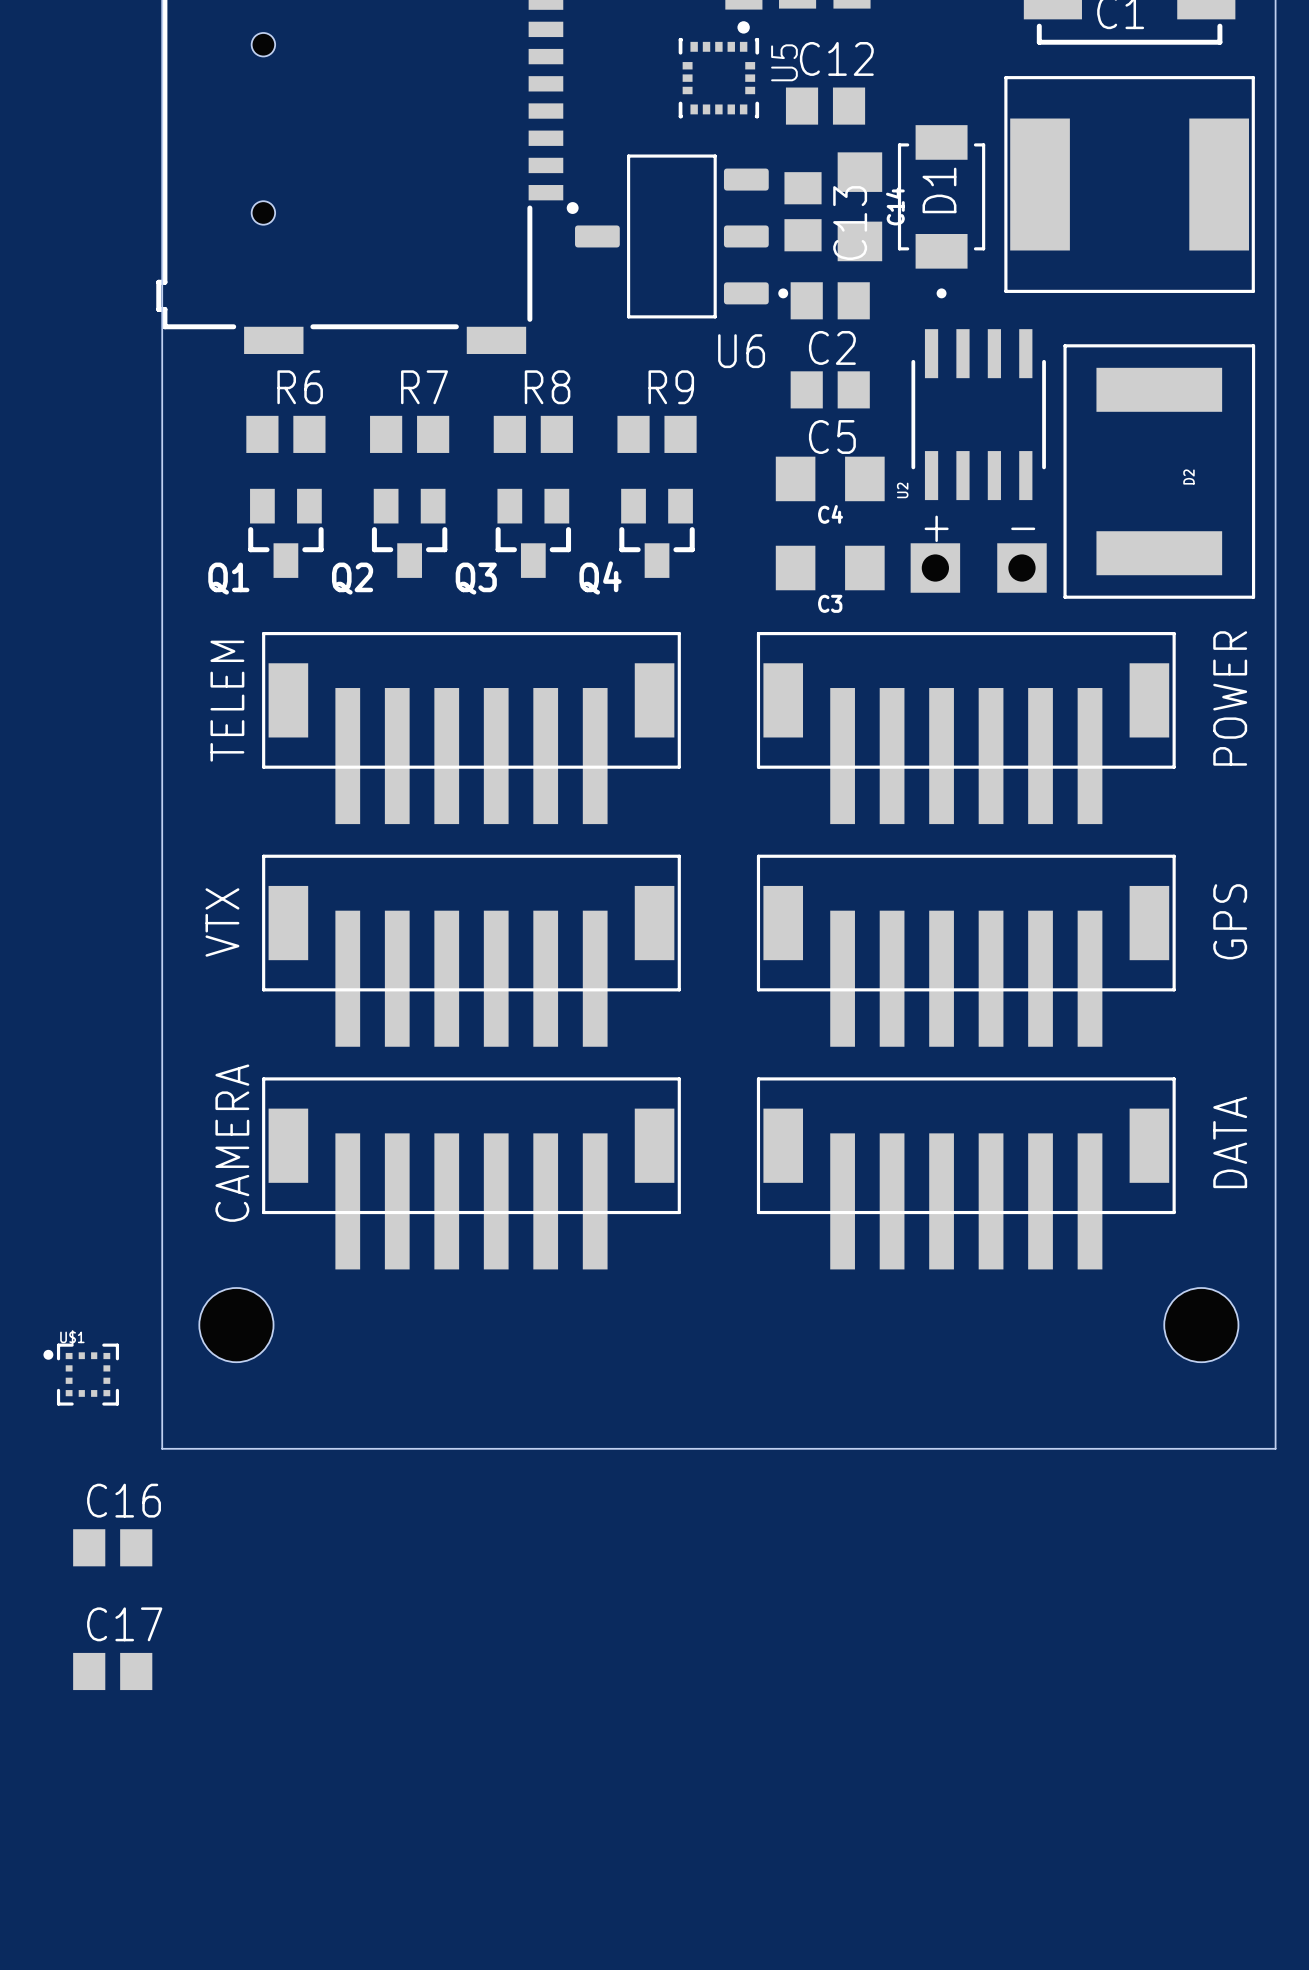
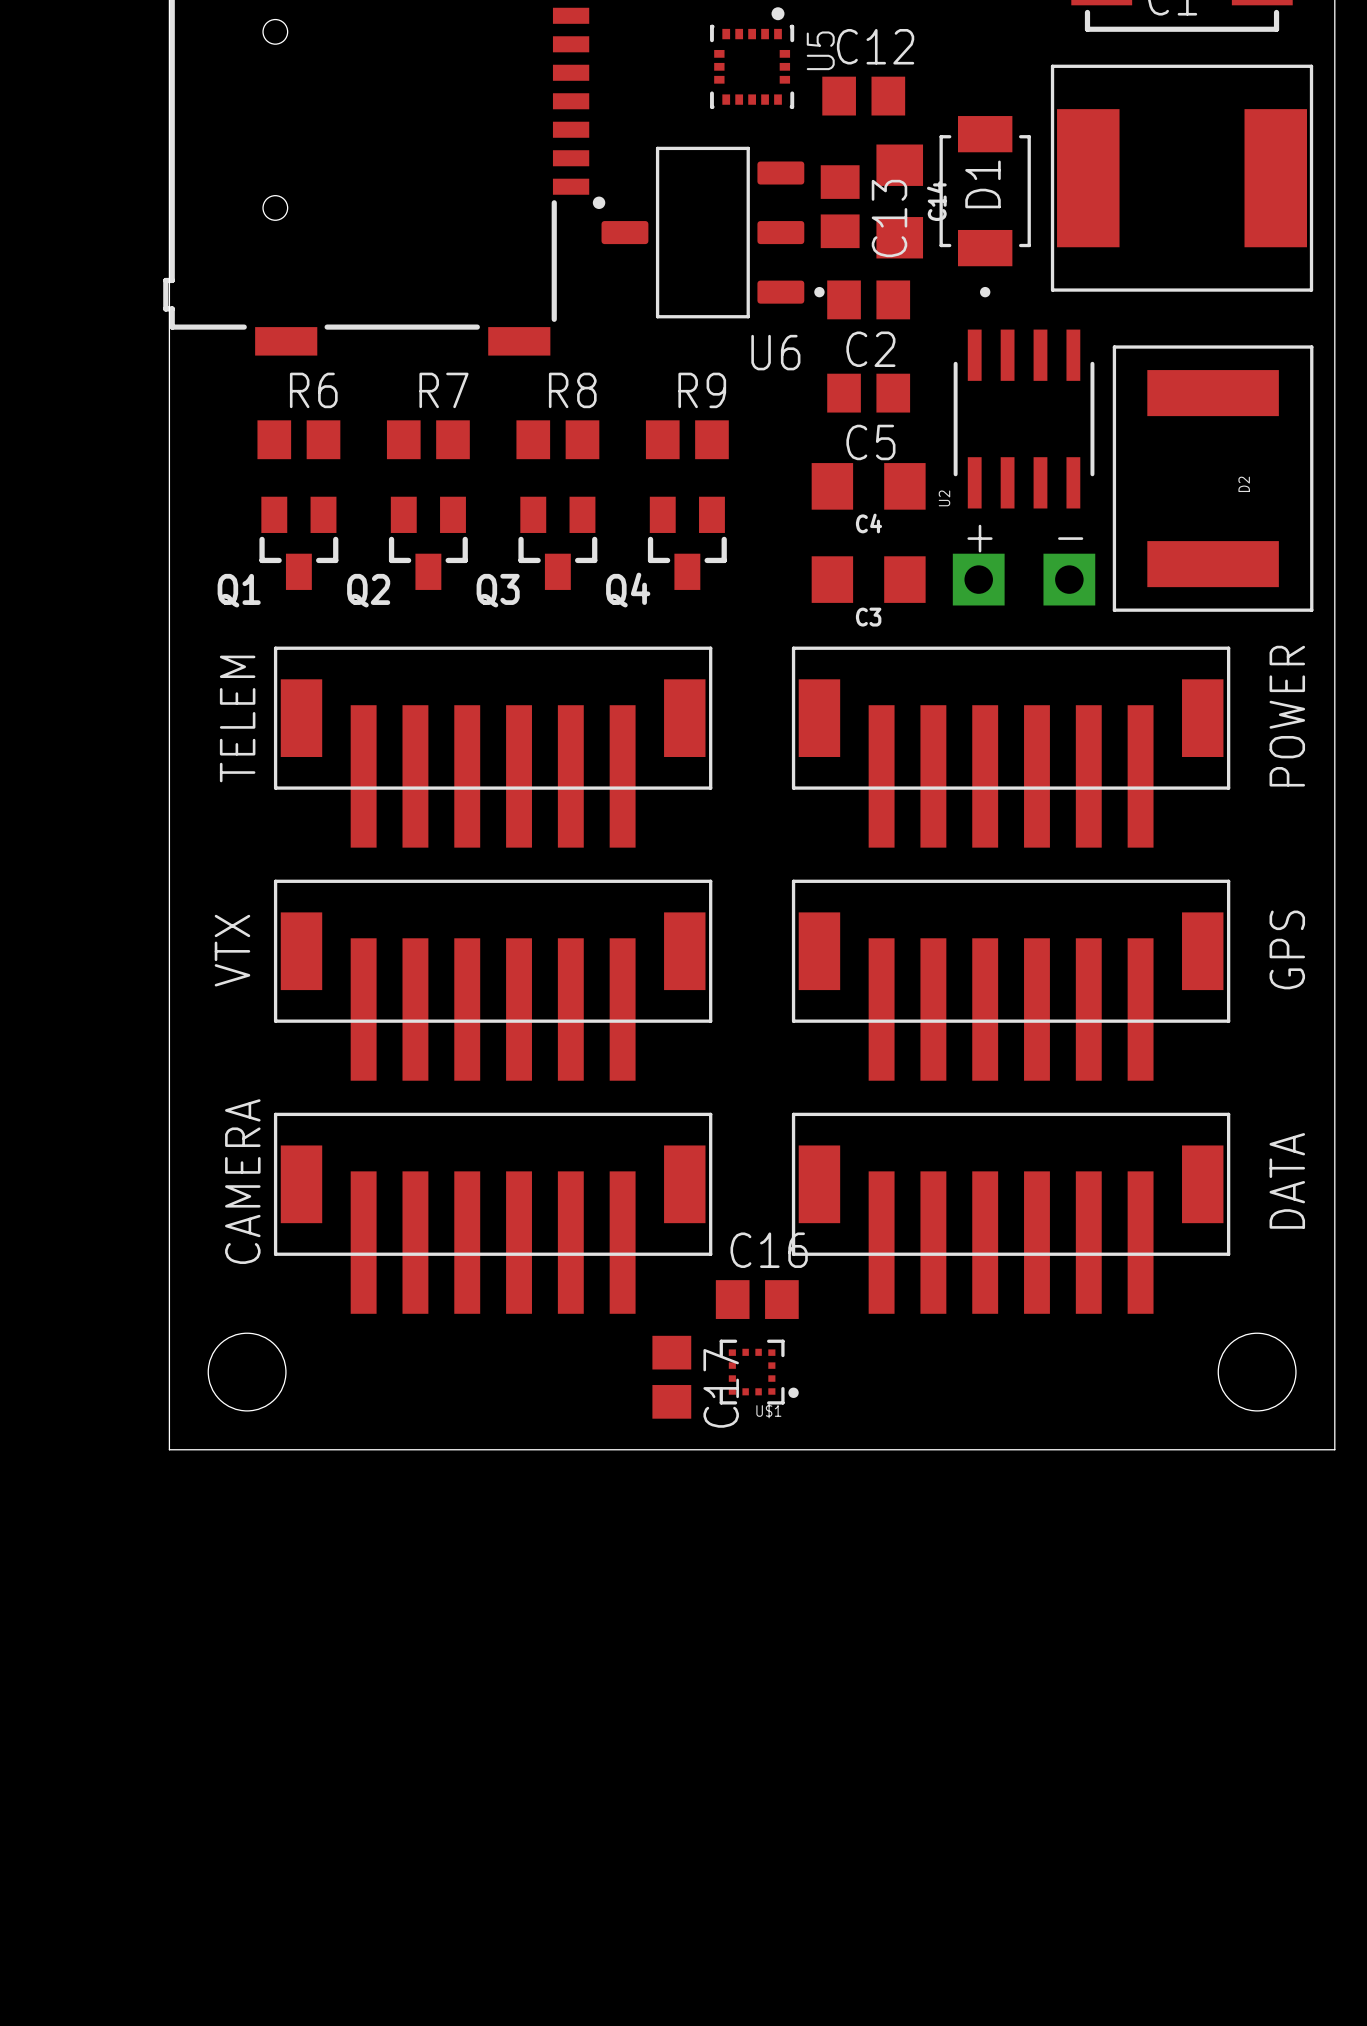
U$1 rotation: 0° (81, 1374) -> 180° (759, 1372)
U$1 position: (81, 1374) -> (759, 1372)
board edge: (162, 1399) (162, 1448) (1275, 1448) (1275, 1399) -> (169, 1449) (1334, 1449)
C16 position: (112, 1547) -> (757, 1299)
C17 rotation: 0° (112, 1671) -> 90° clockwise (671, 1377)
C17 position: (112, 1671) -> (671, 1377)

